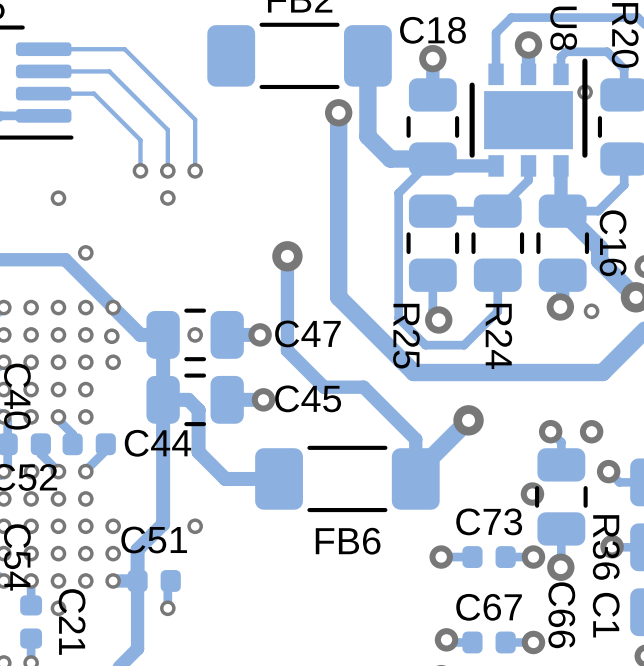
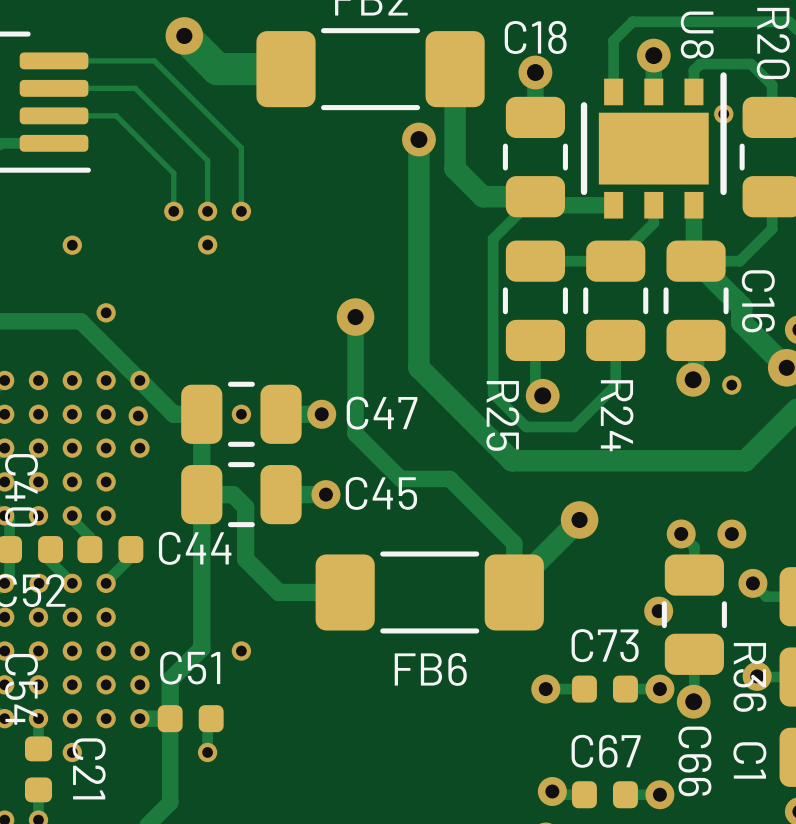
track: none -> (184, 35) (217, 69) (286, 69)
via: none -> (184, 35)

